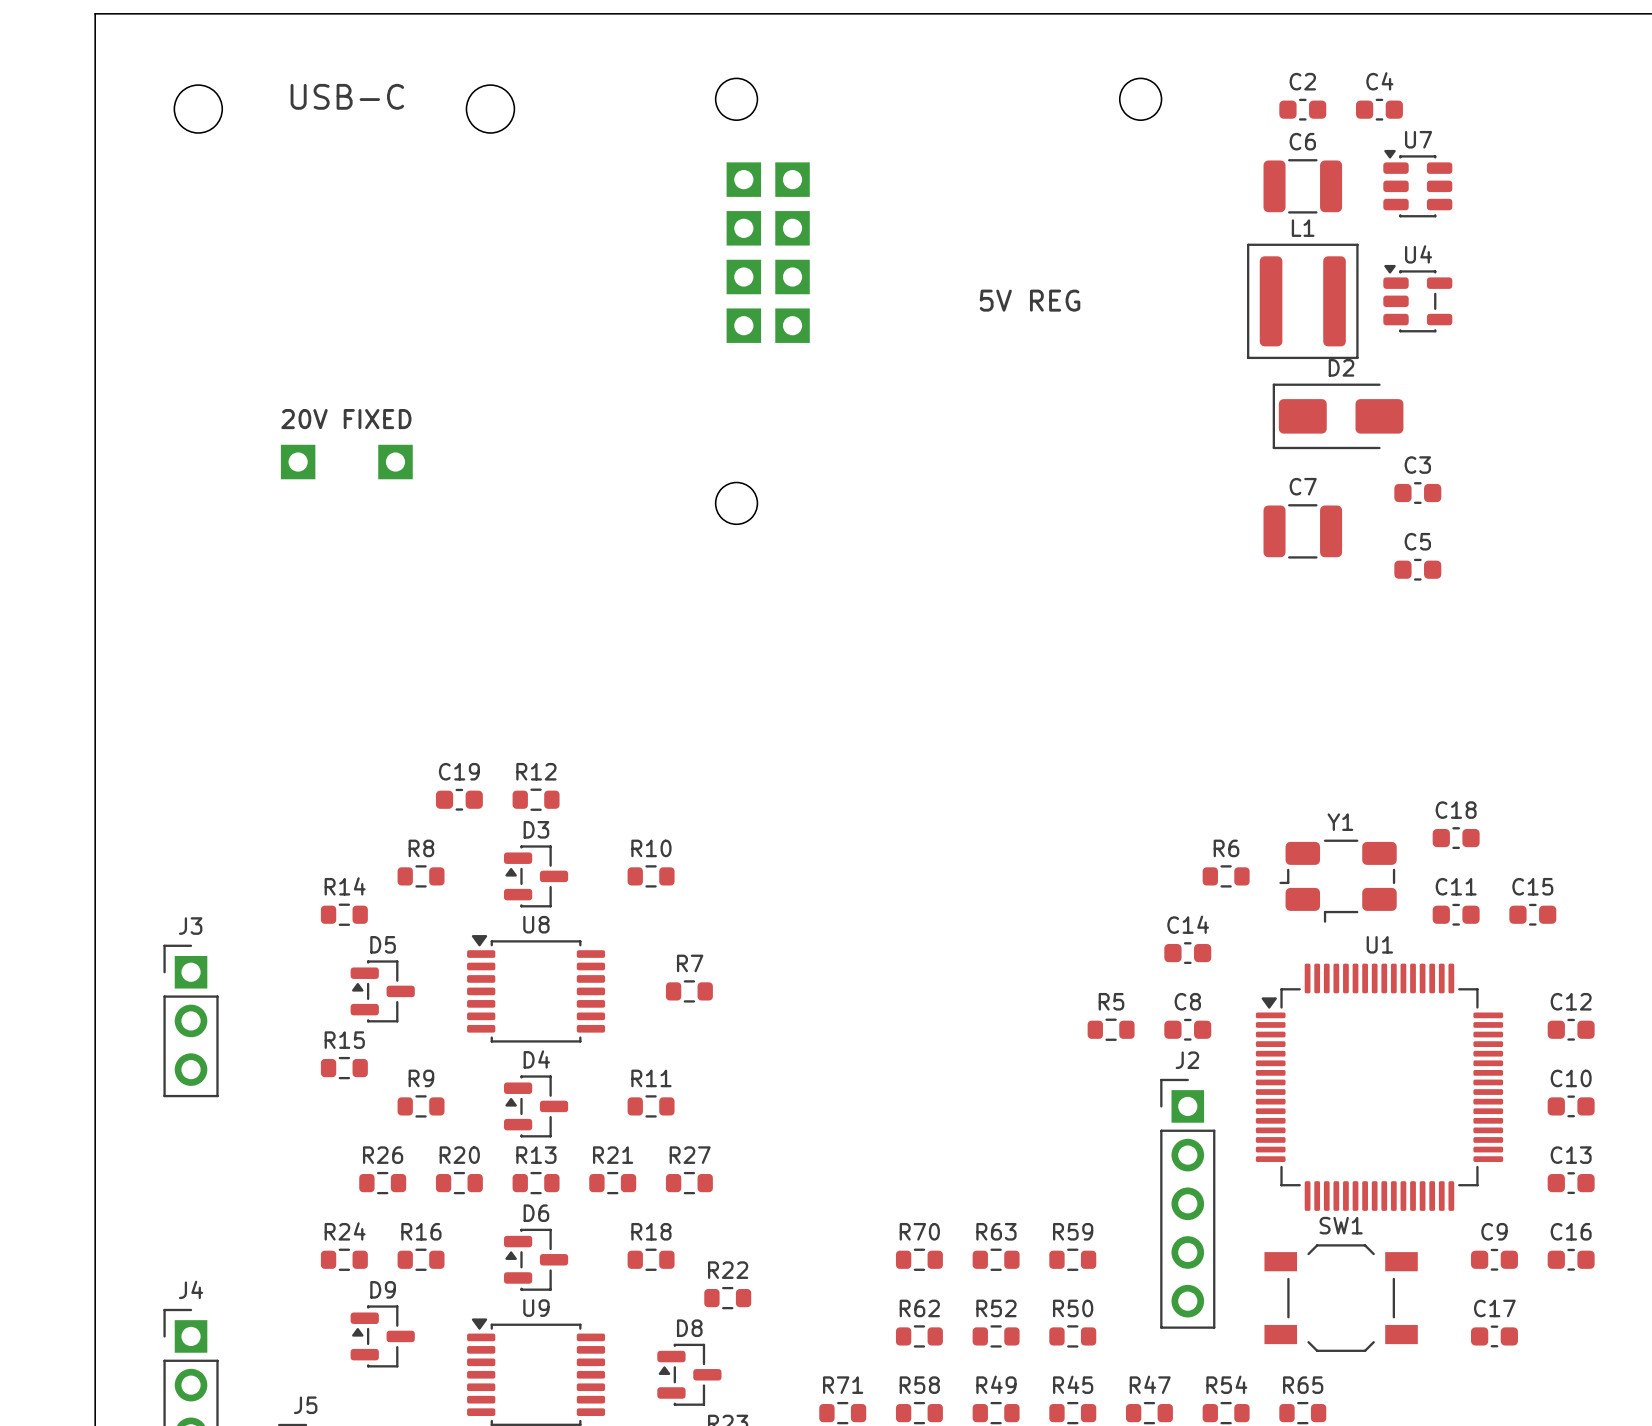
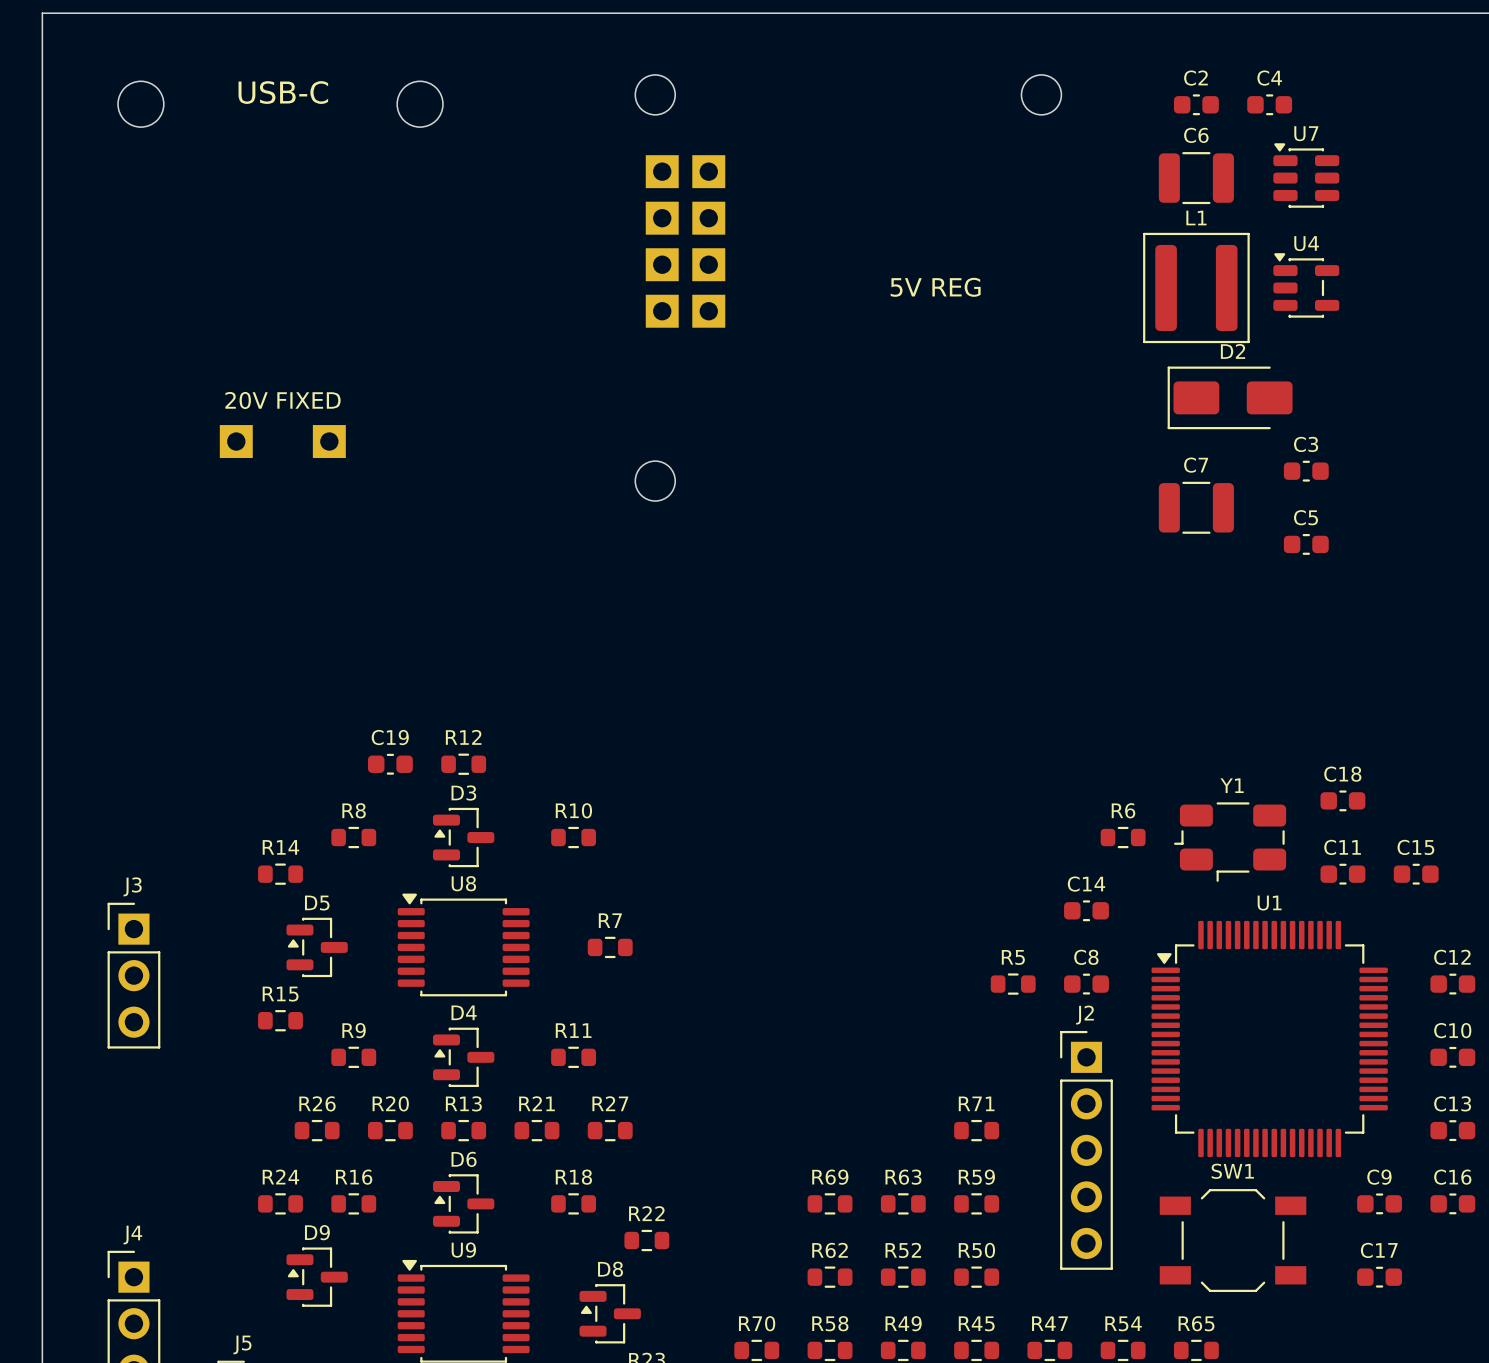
R71: none -> (976, 1130)
R70 name: R70 (919, 1231) -> R69 (830, 1177)
R71 name: R71 (843, 1385) -> R70 (757, 1323)

